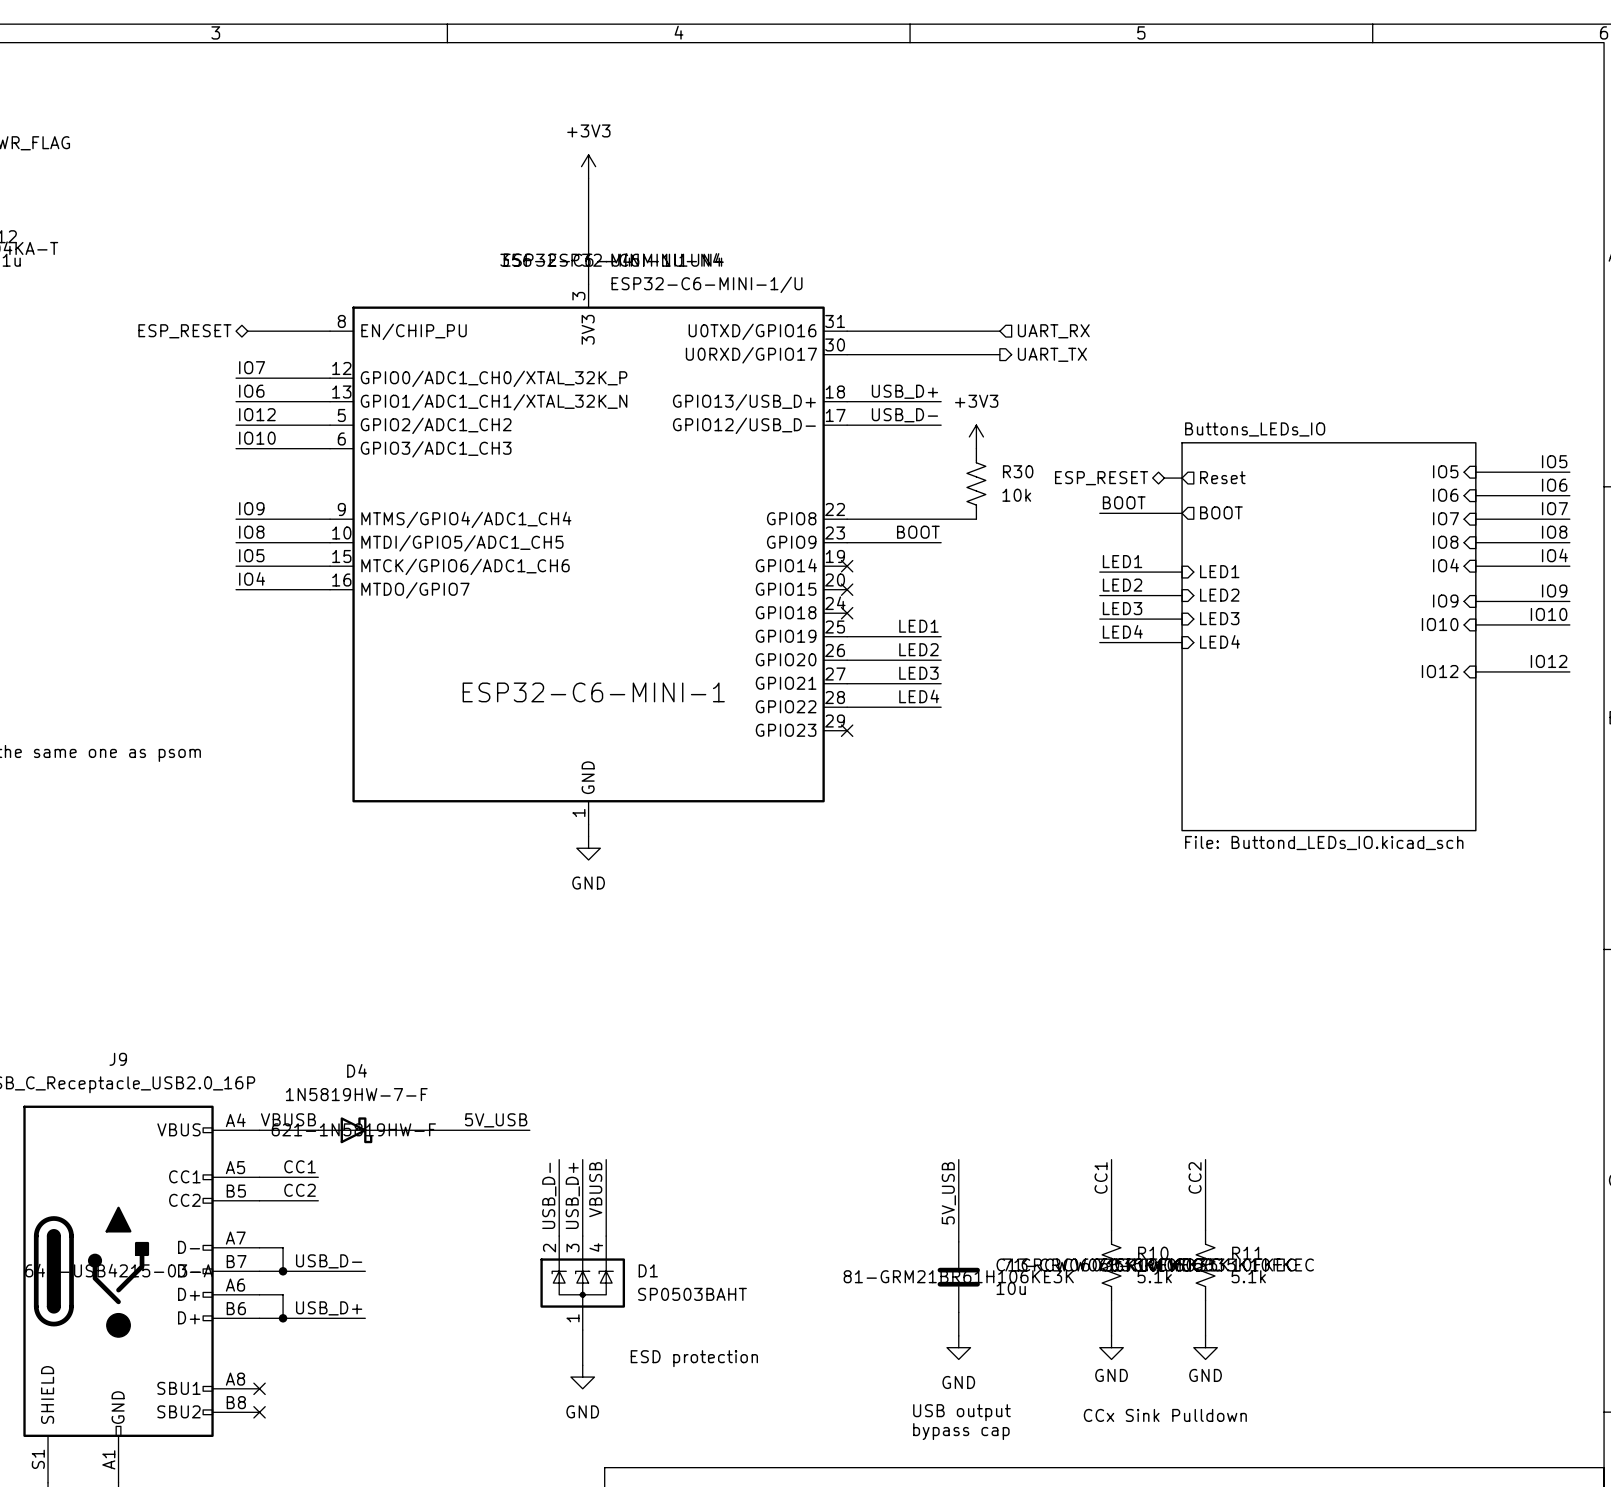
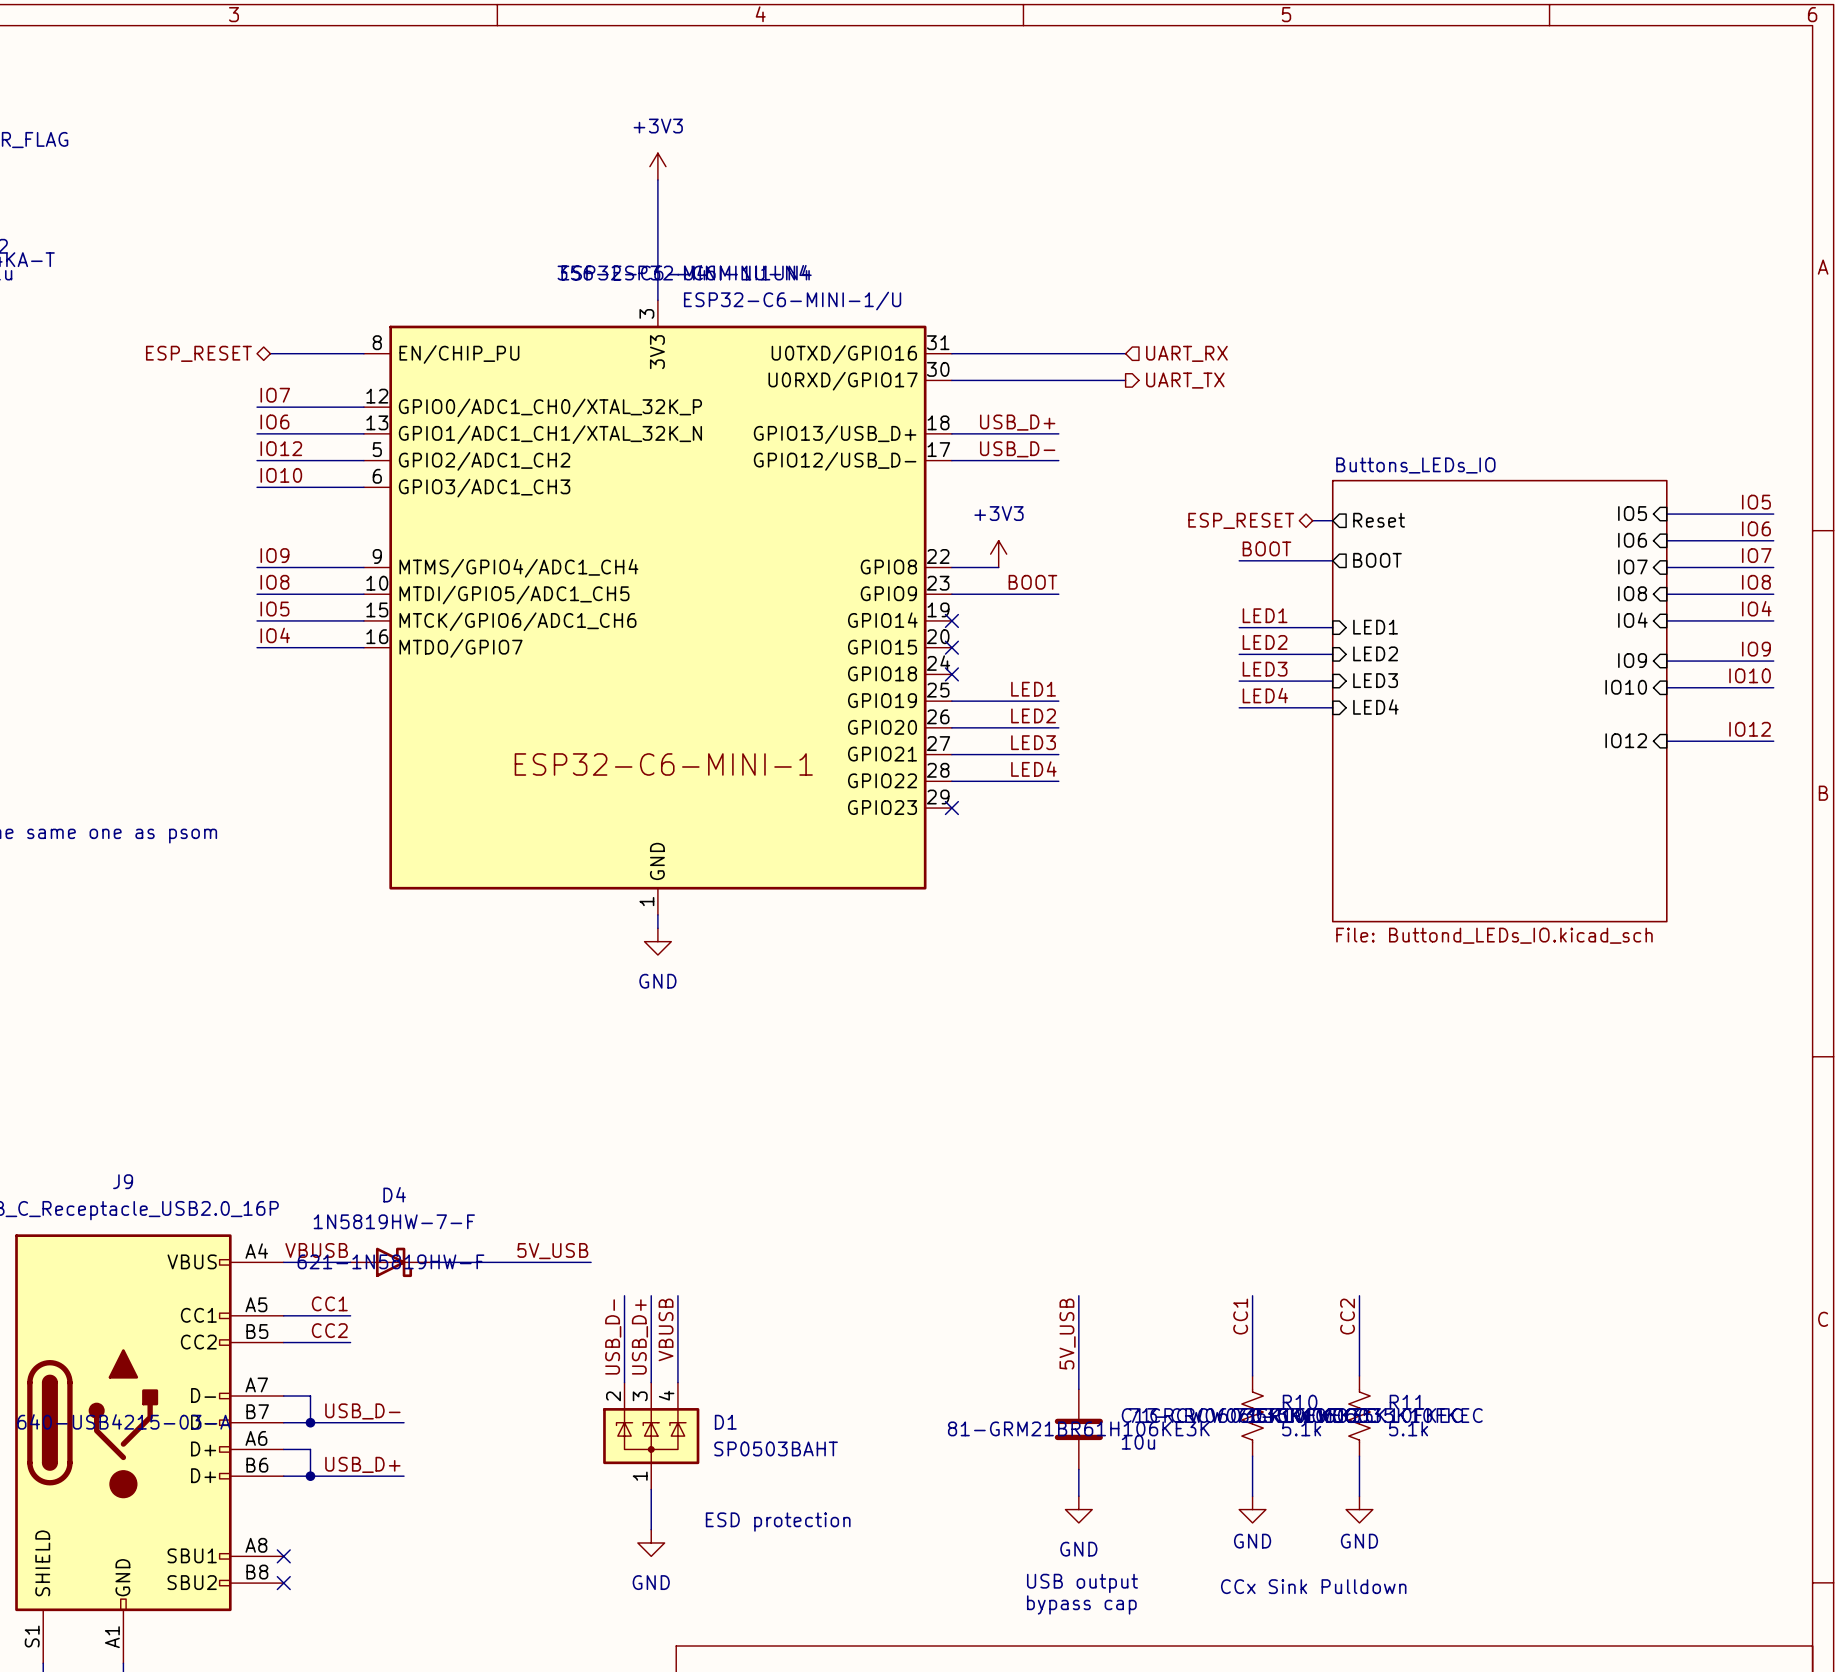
power symbol position: +3V3 (976, 436) -> +3V3 (998, 554)
R30: 10k (976, 483) -> none
wire: (888, 519) (976, 519) -> none

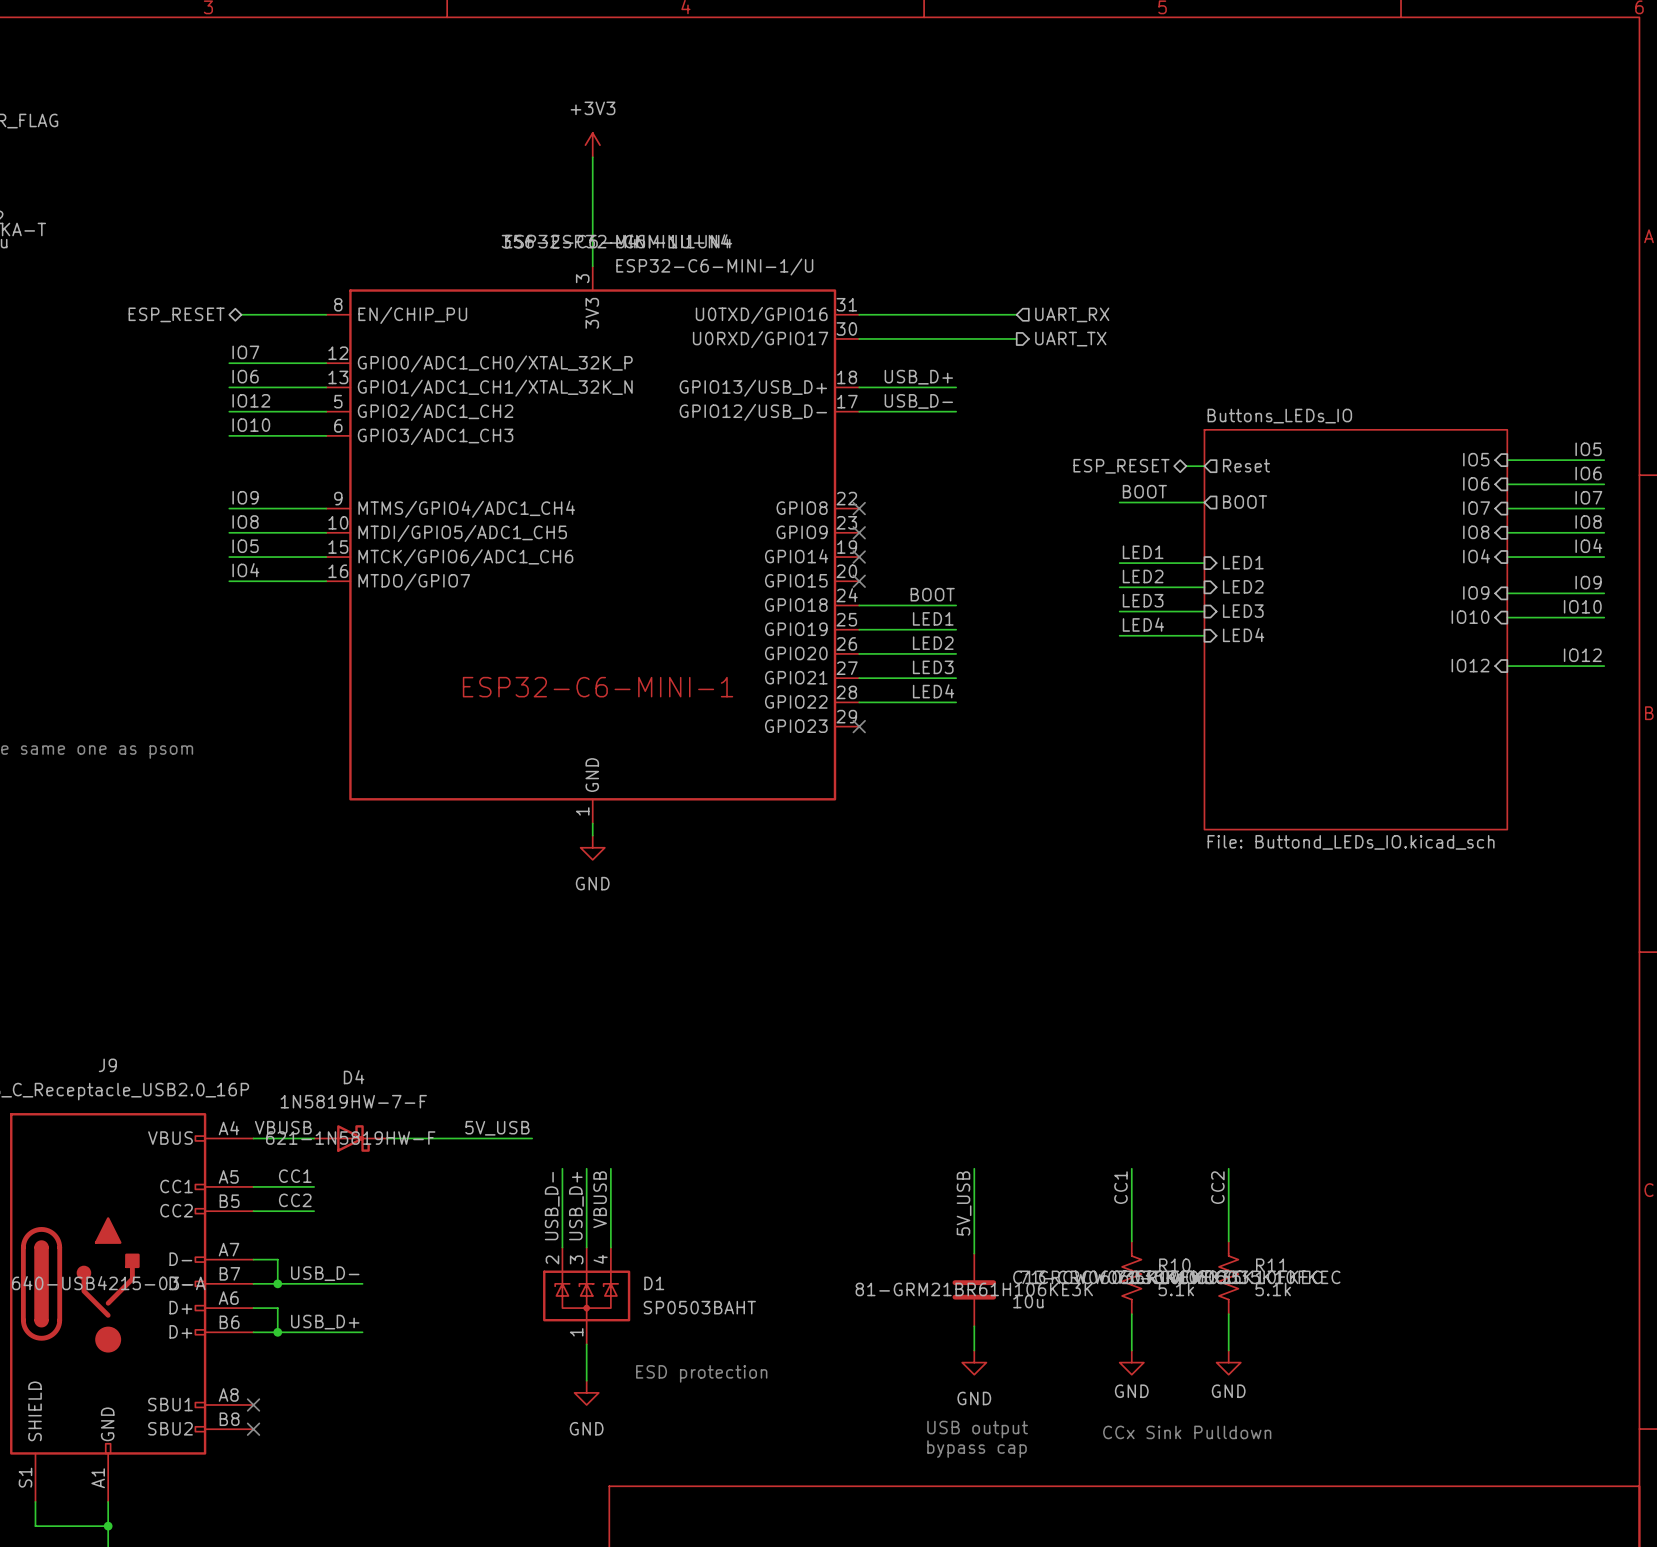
power symbol: +3V3 (998, 554) -> none
wire: (951, 567) (998, 567) -> none
no-connect mark: none -> (859, 508)
label position: BOOT (1032, 582) -> BOOT (932, 594)
wire: (951, 594) (1058, 594) -> (859, 605) (956, 605)
no-connect mark: none -> (859, 532)
no-connect mark: (951, 674) -> none

